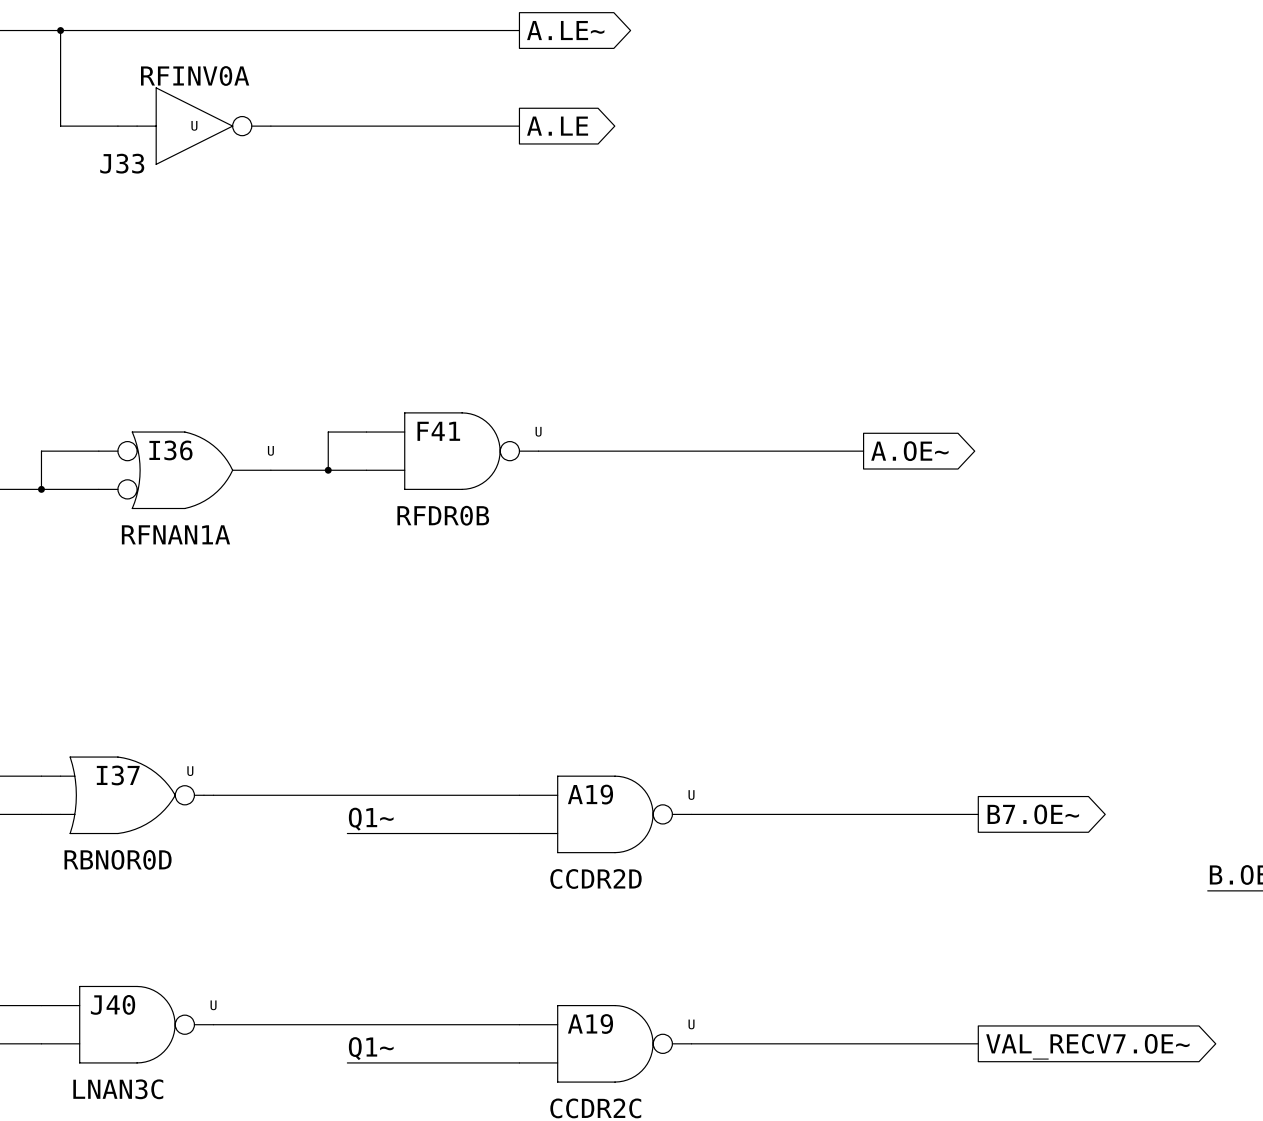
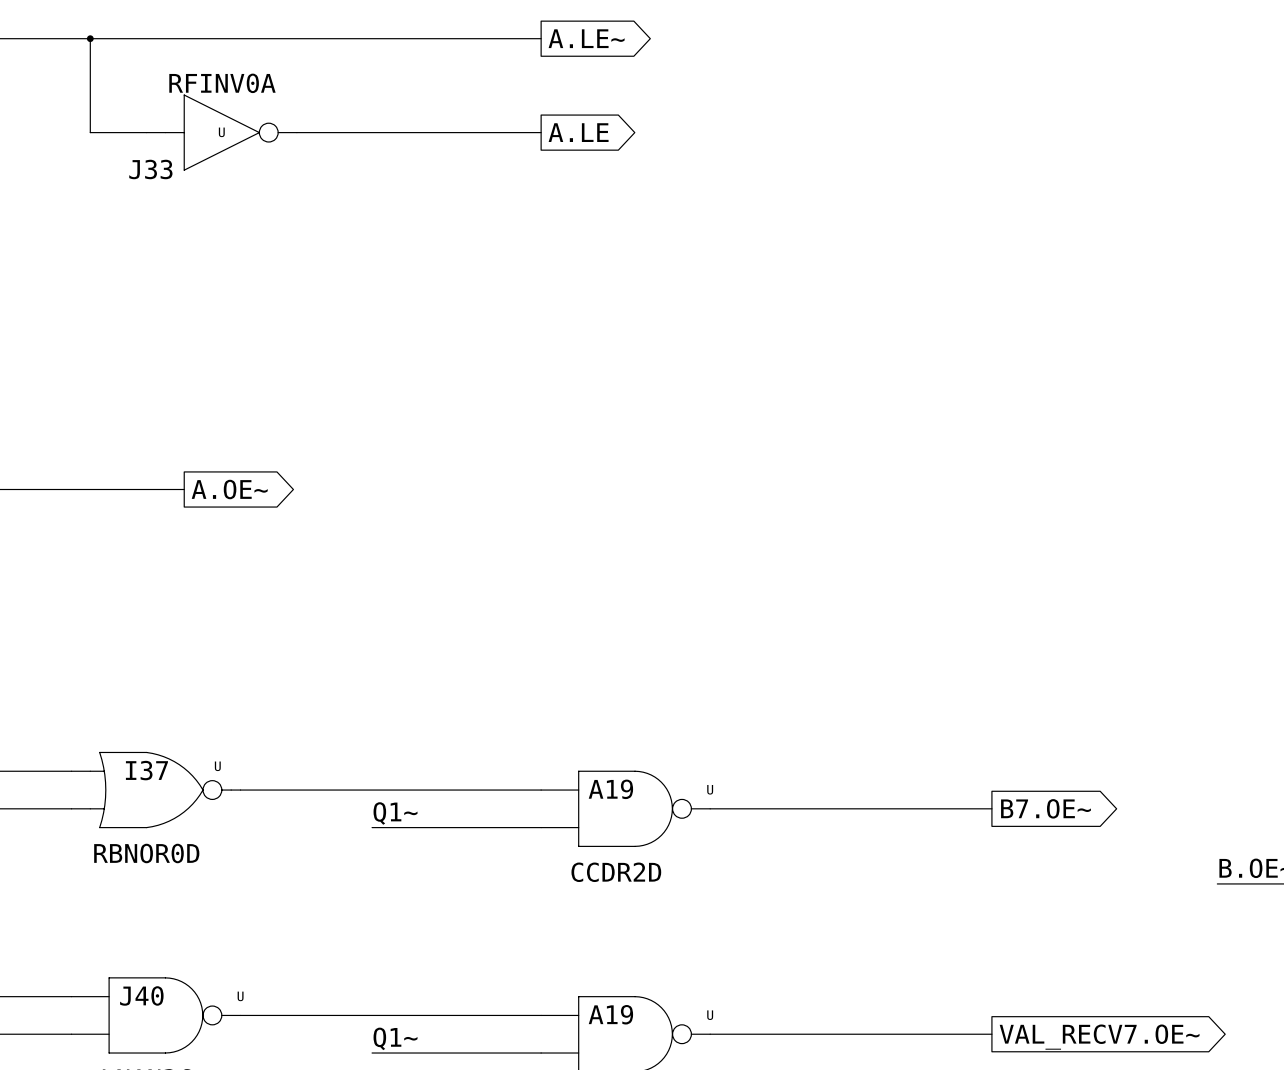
wire: (366, 432) (328, 432) (328, 470) -> none
wire: (98, 451) (41, 451) (41, 489) -> none
U: (452, 451) -> none
wire: (538, 451) (863, 451) -> none
global label: A.OE~ (909, 451) -> none
U: (184, 470) -> none
wire: (270, 470) (366, 470) -> none
junction: (328, 470) -> none
junction: (41, 489) -> none
wire: none -> (127, 489) (184, 489)
global label: none -> A.OE~ (229, 489)

